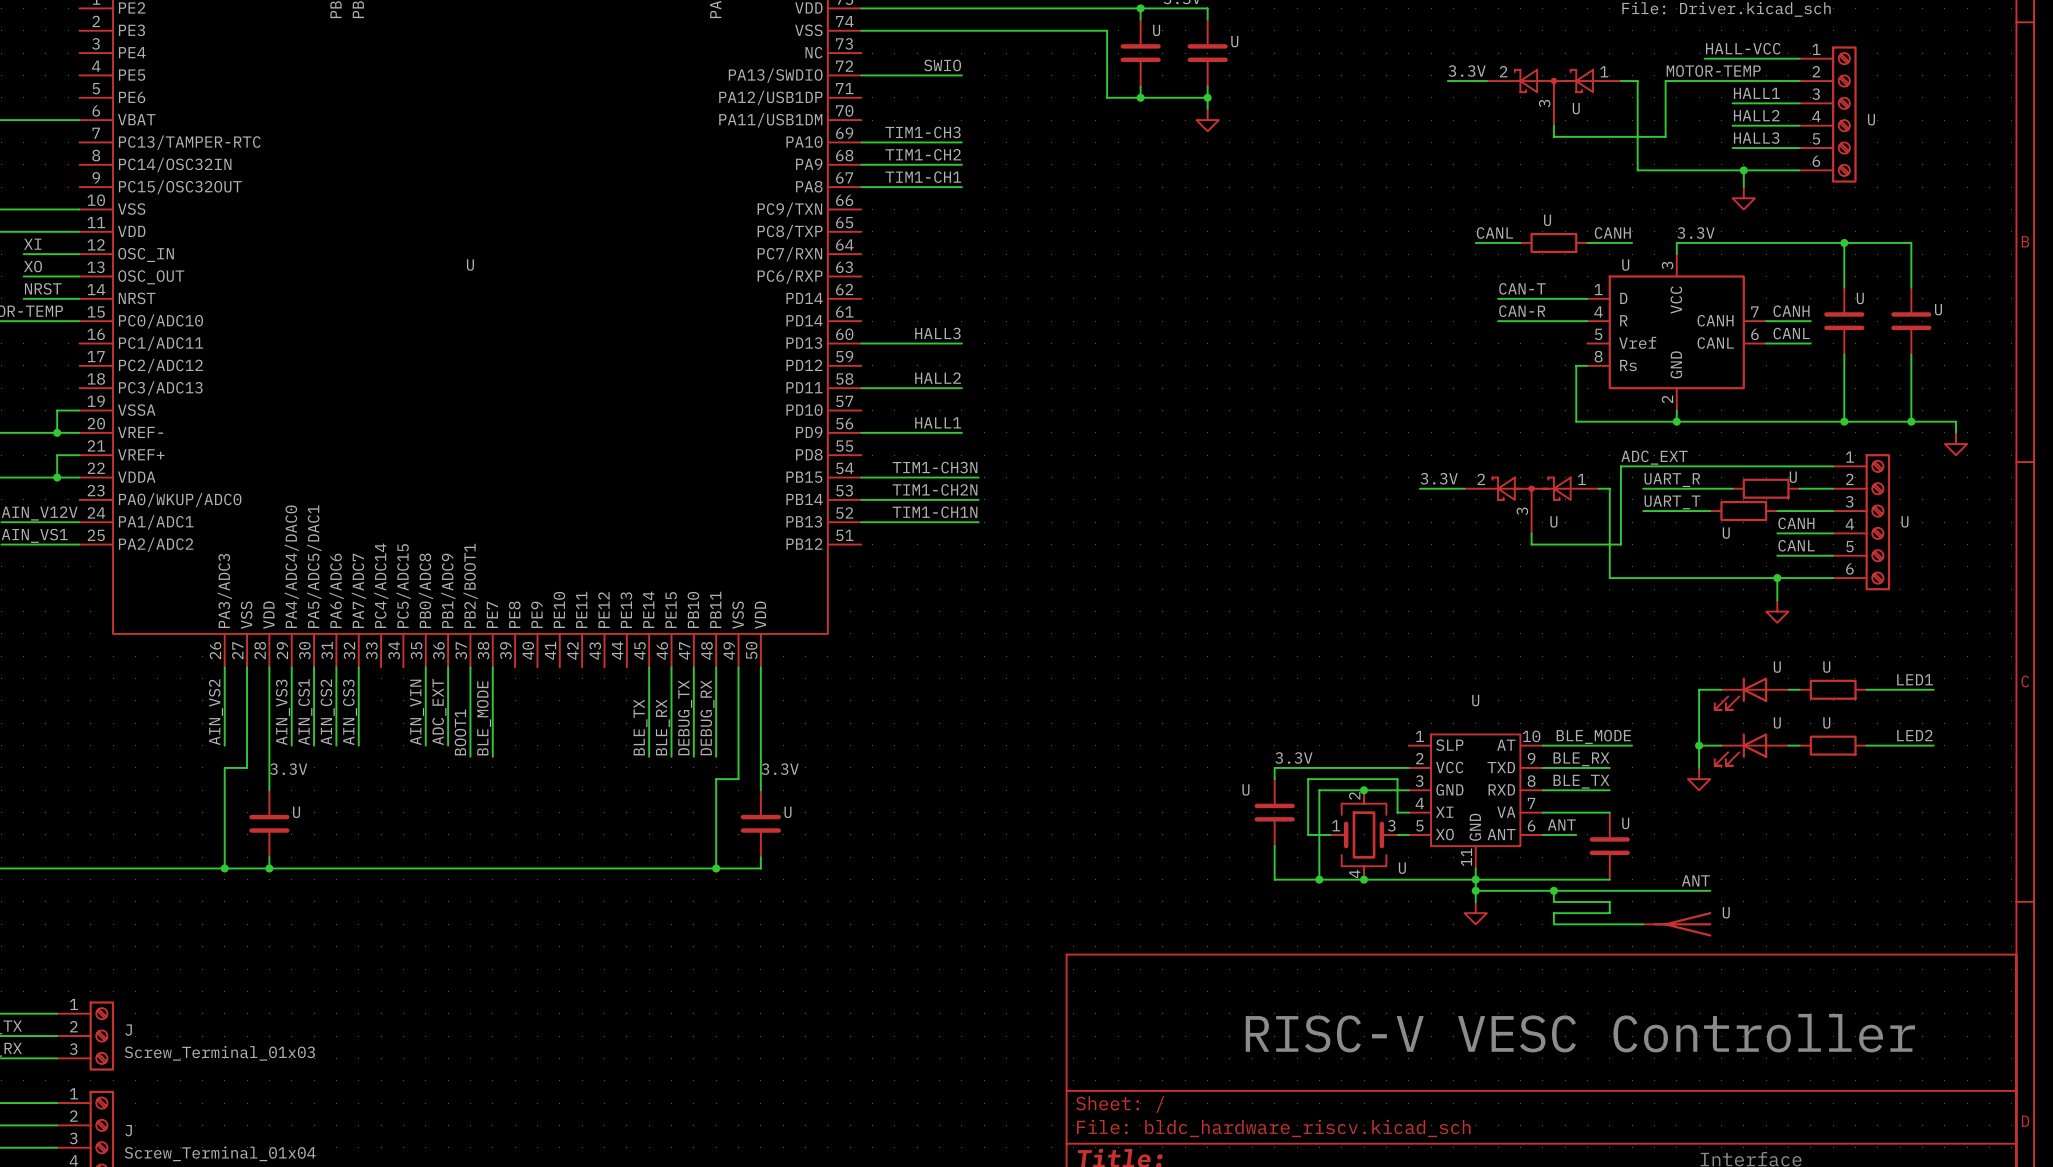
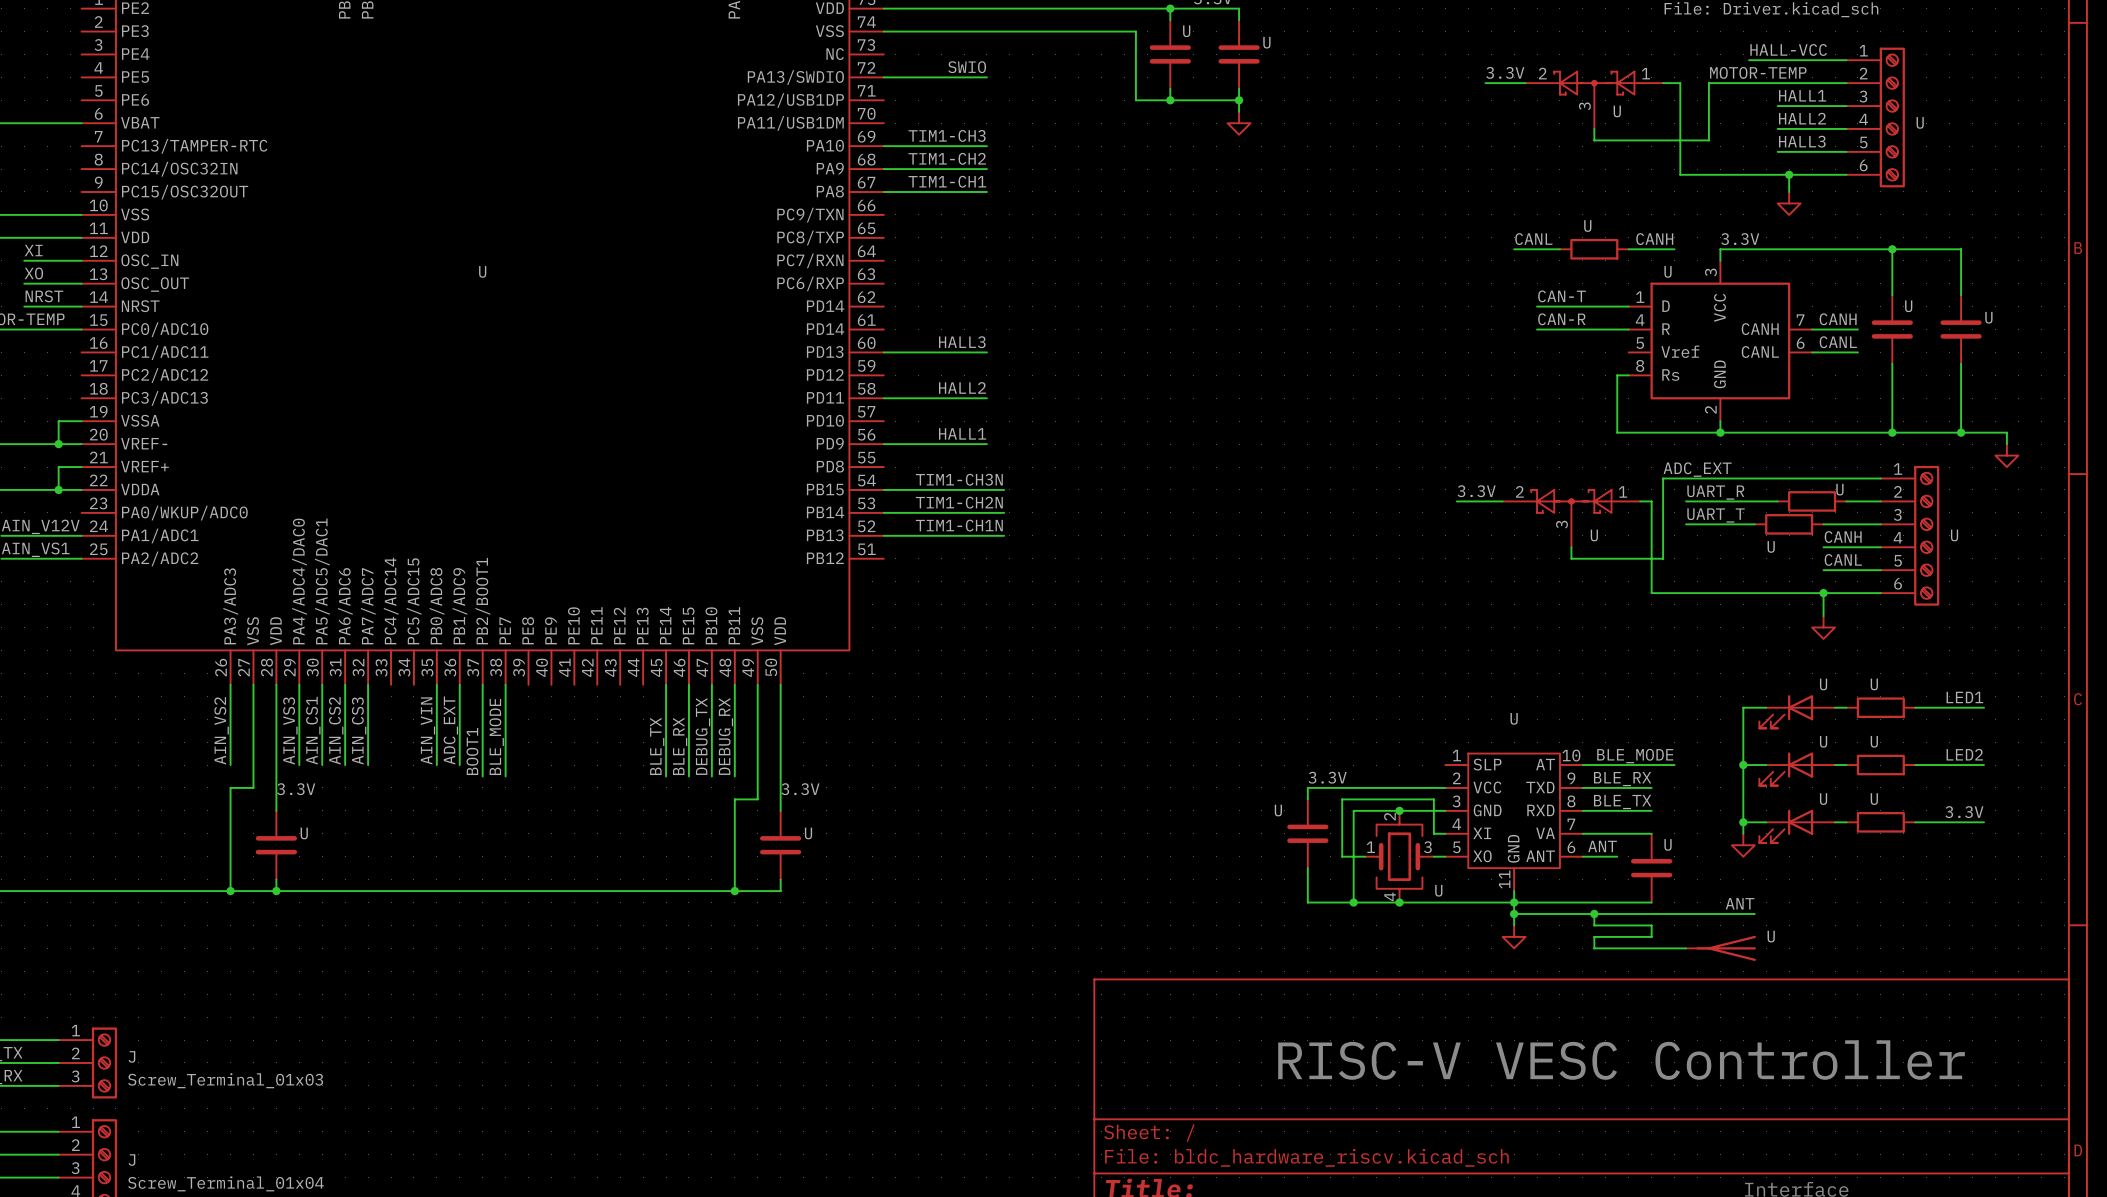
wire: none -> (1743, 787) (1743, 833)
power symbol position: (1699, 779) -> (1743, 845)
label: none -> 3.3V (1964, 812)
wire: none -> (1743, 822) (1766, 822)
junction: none -> (1743, 822)
wire: none -> (1835, 822) (1846, 822)
U: none -> (1880, 822)
wire: none -> (1915, 822) (1983, 822)
U: none -> (1797, 826)

